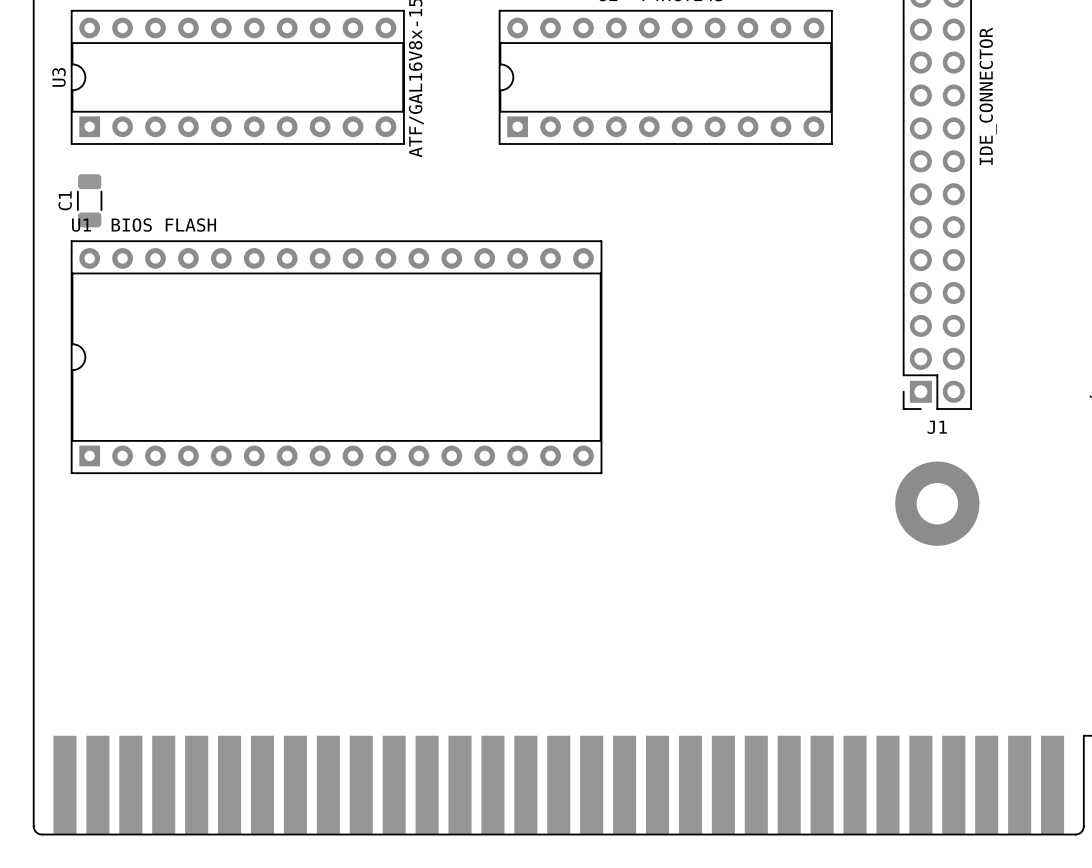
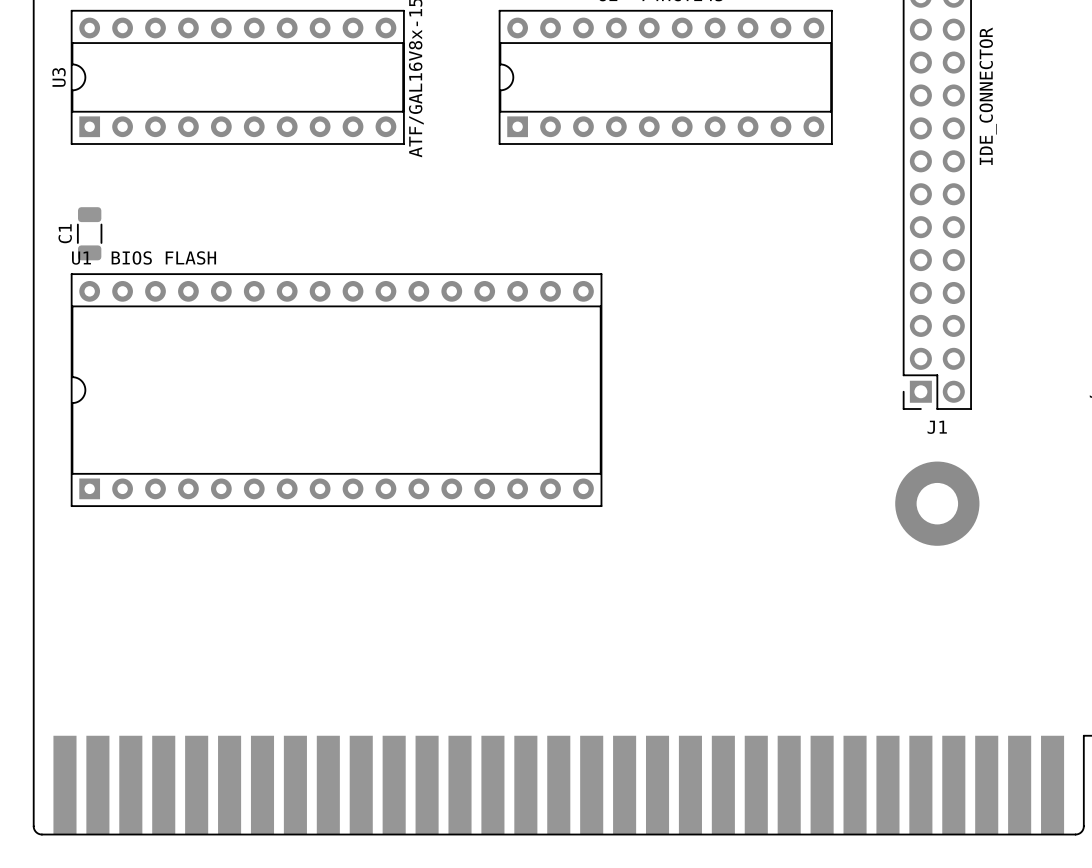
C1 position: (89, 200) -> (89, 233)
U1 position: (336, 357) -> (336, 390)

